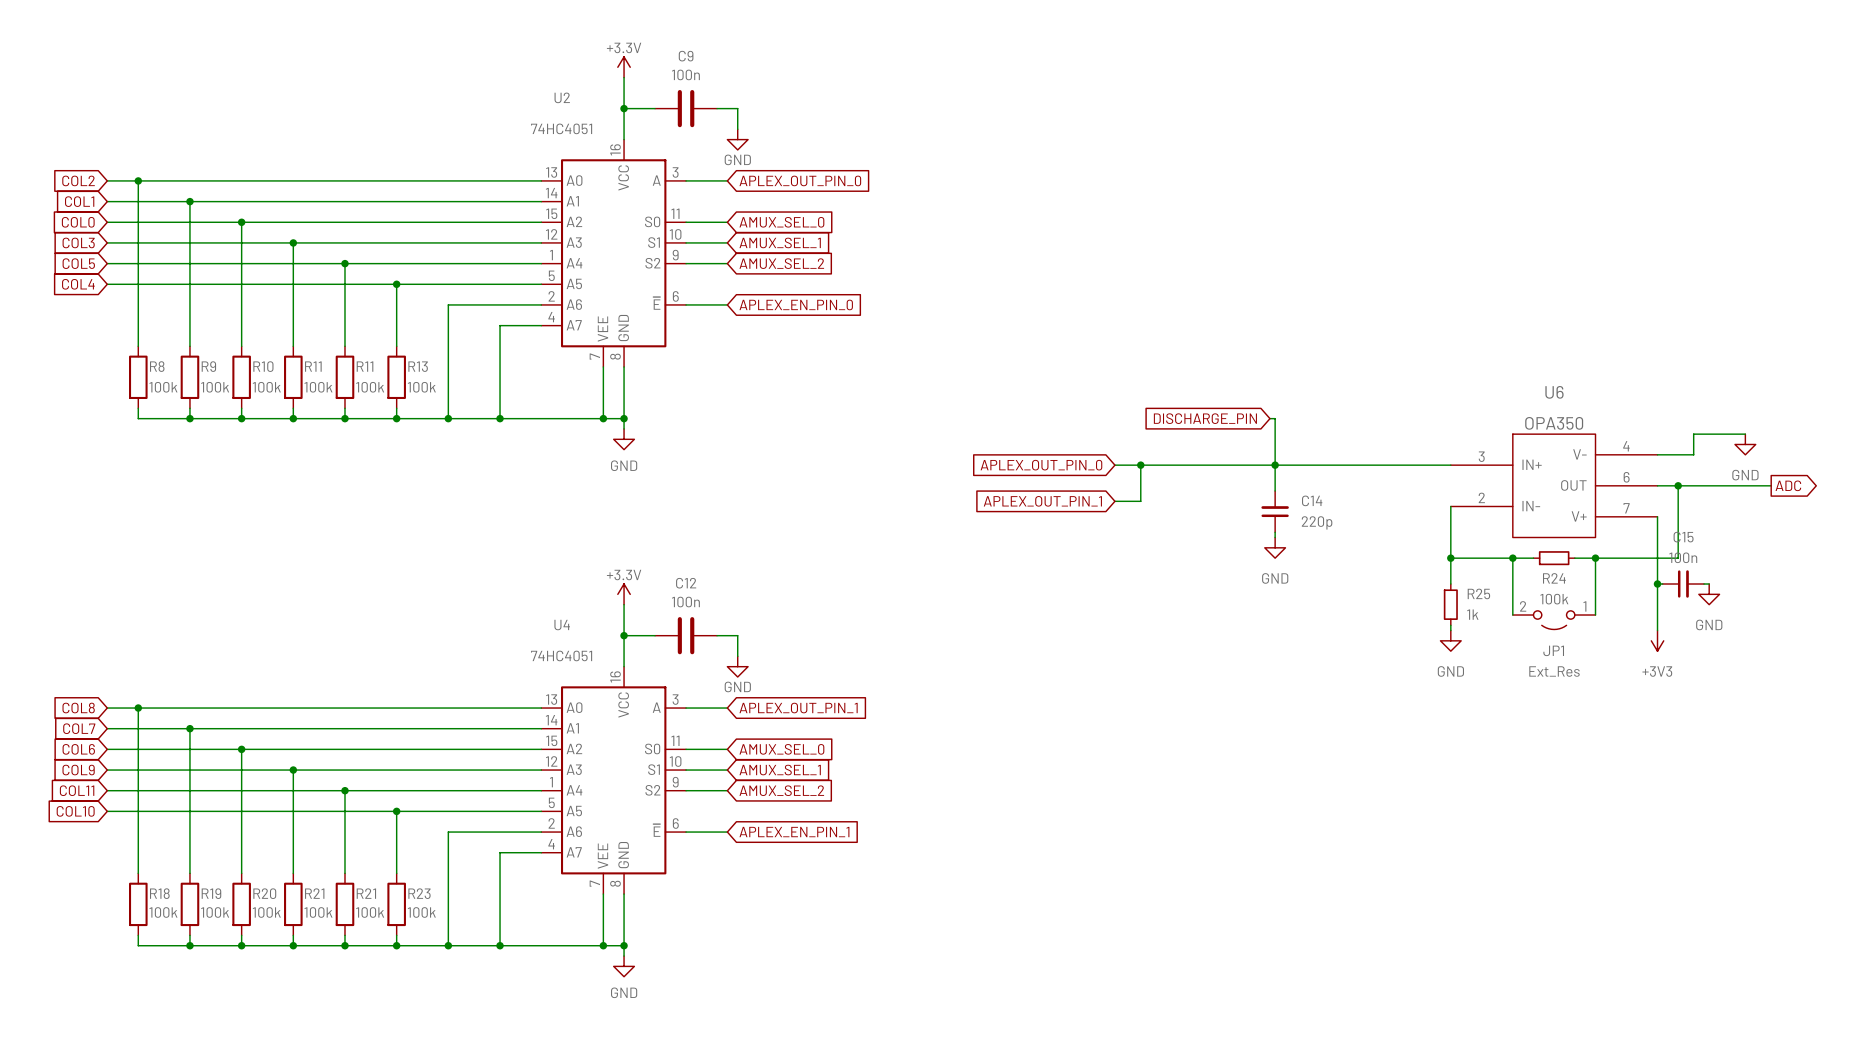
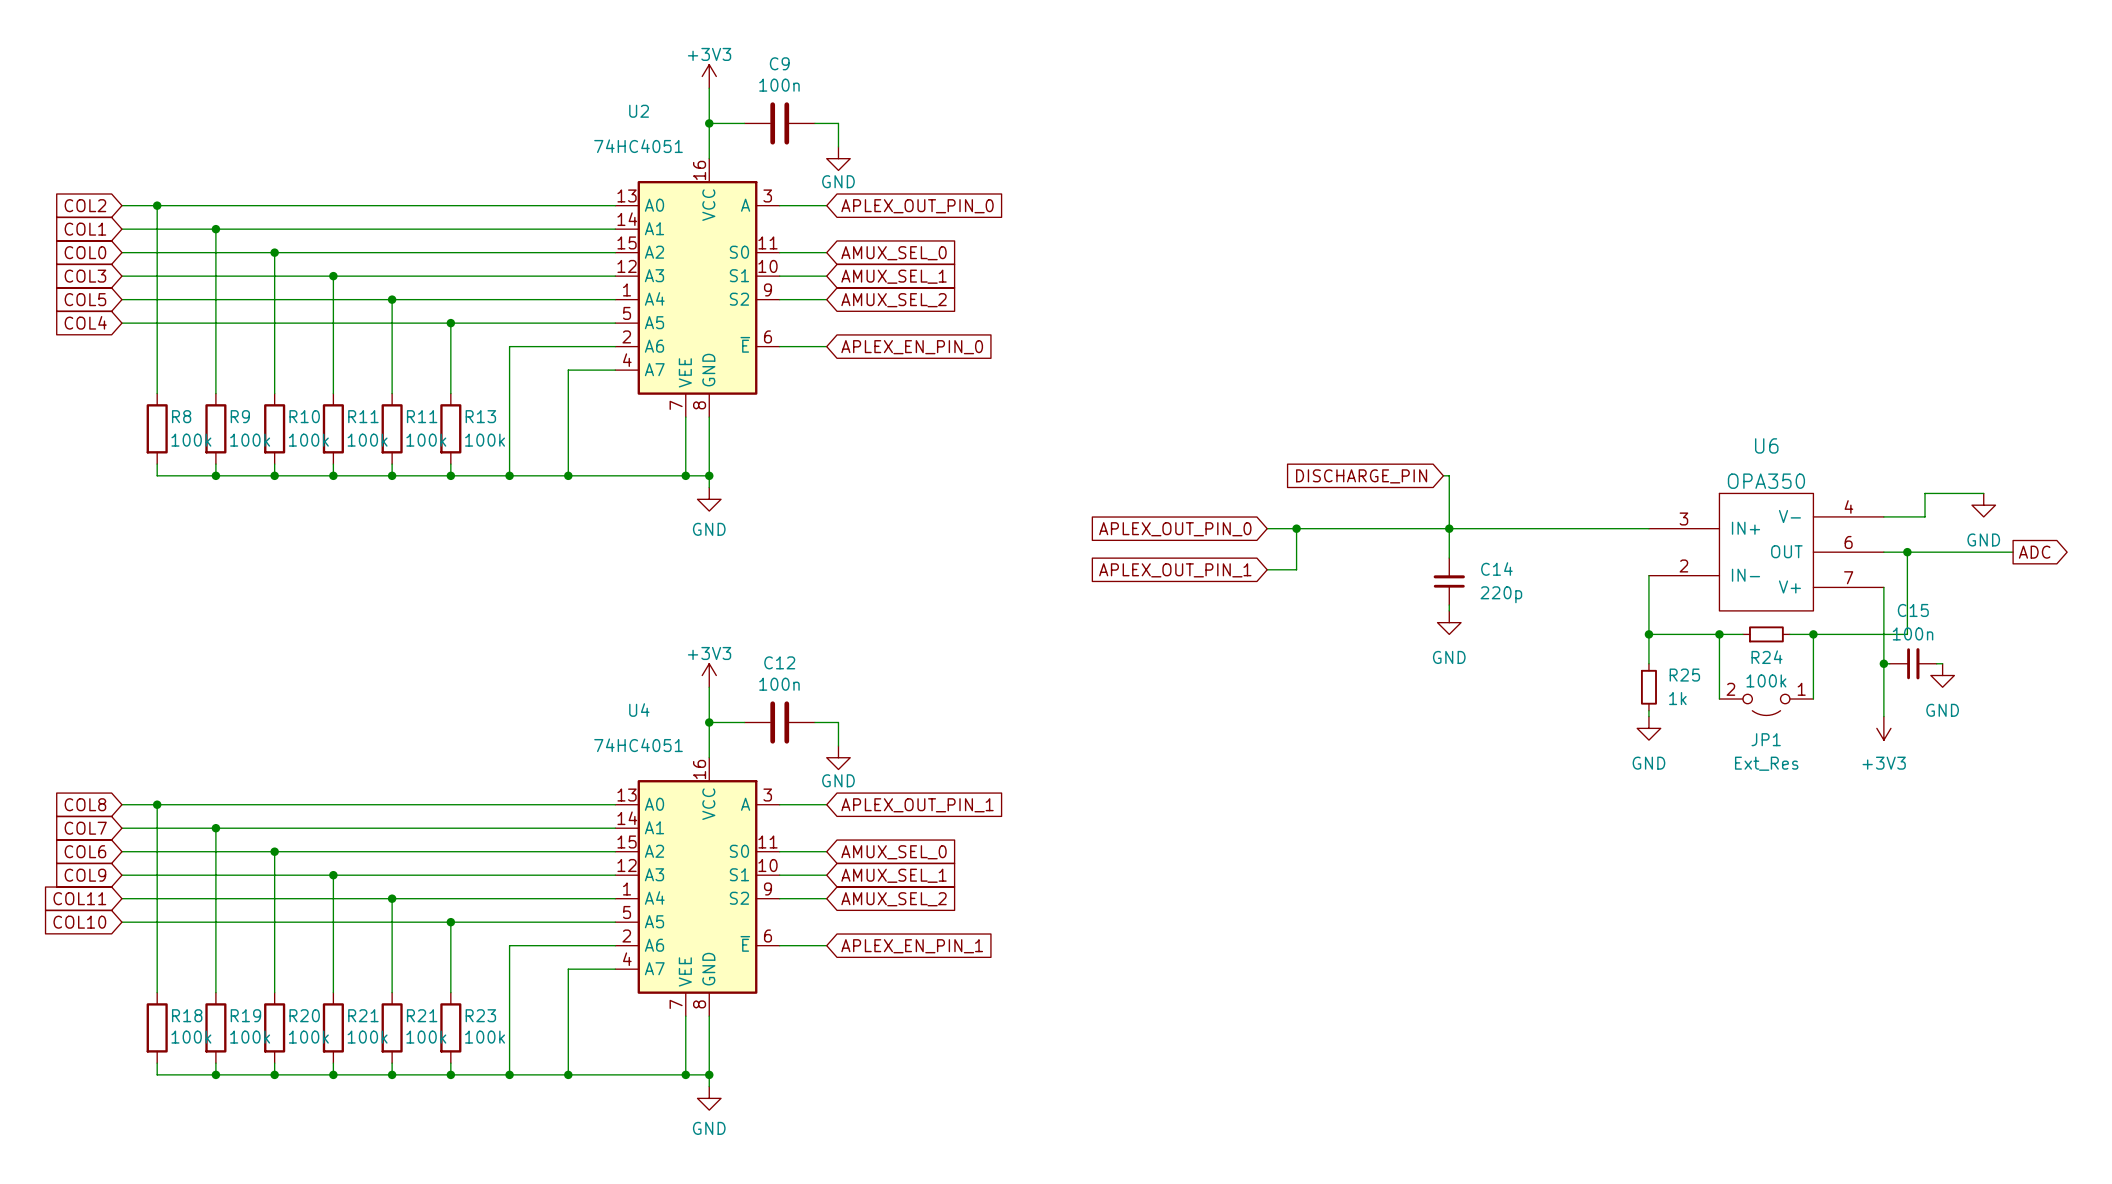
power symbol: +3.3V (624, 67) -> +3V3 (709, 76)
power symbol: +3.3V (624, 594) -> +3V3 (709, 675)

